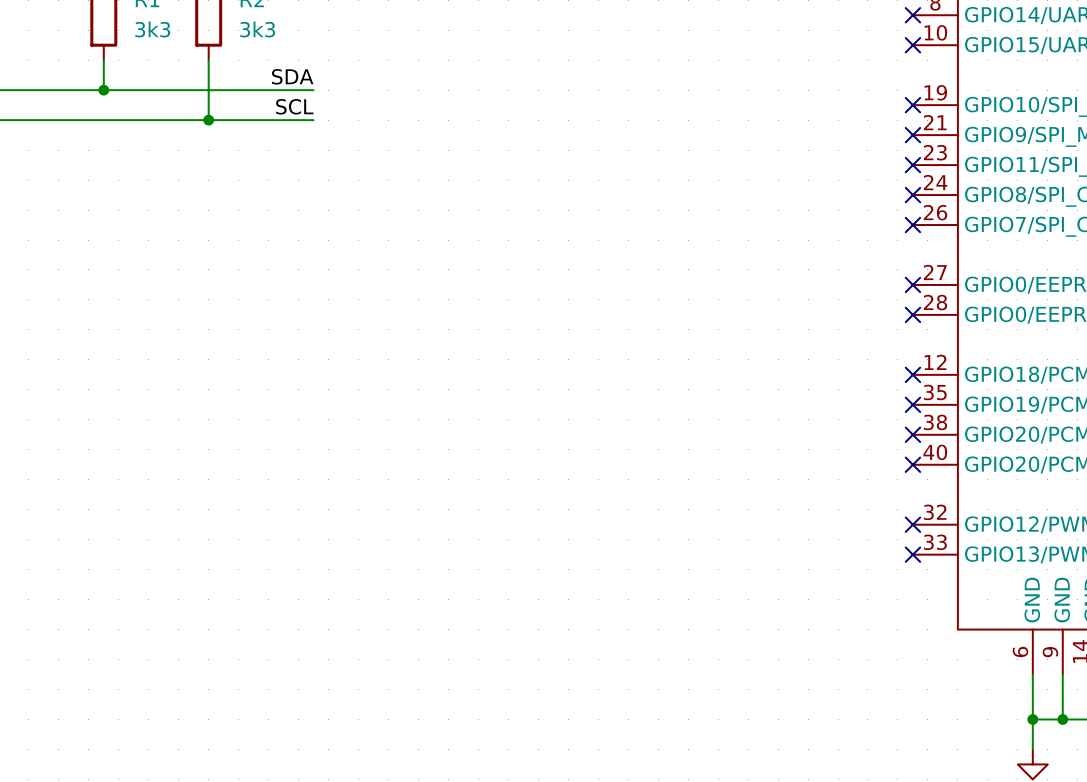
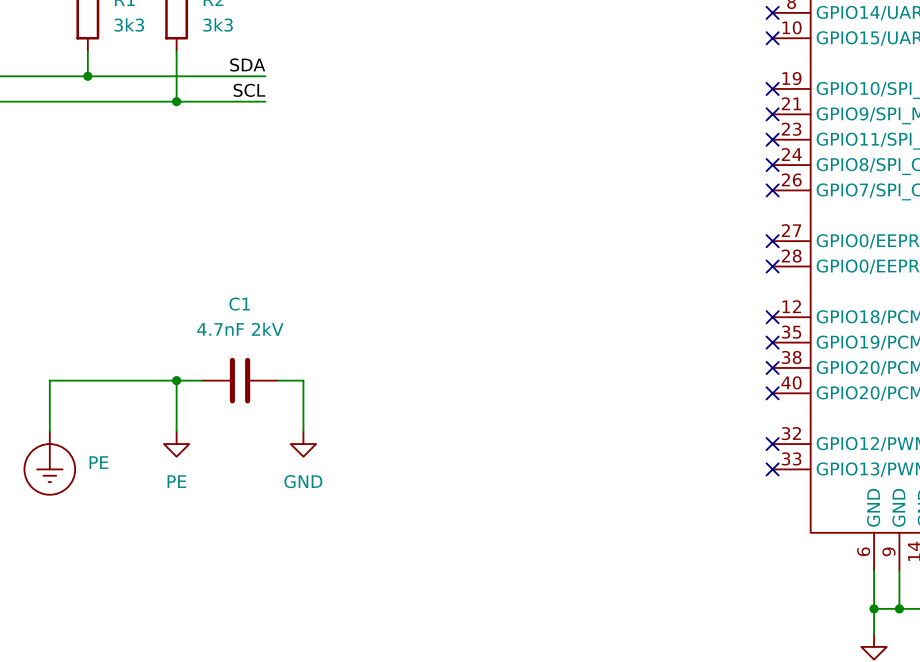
wire: none -> (176, 380) (176, 431)
junction: none -> (176, 380)
wire: none -> (201, 380) (49, 380) (49, 431)
C1: none -> 4.7nF 2kV (240, 380)
wire: none -> (278, 380) (303, 380) (303, 431)
power symbol: none -> PE (176, 444)
power symbol: none -> GND (303, 444)
part: none -> PE (49, 463)

